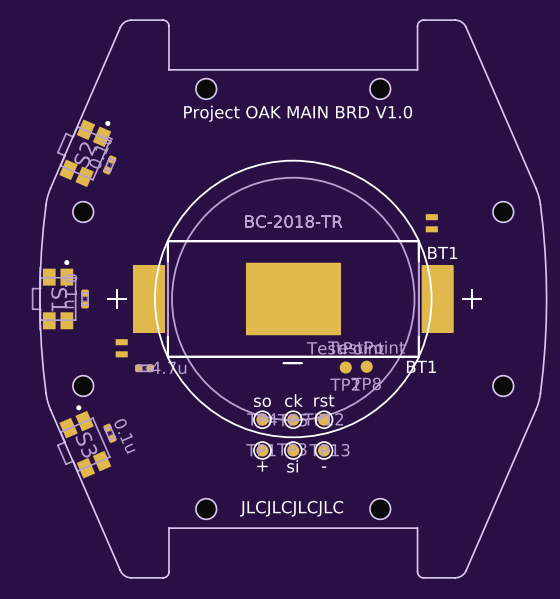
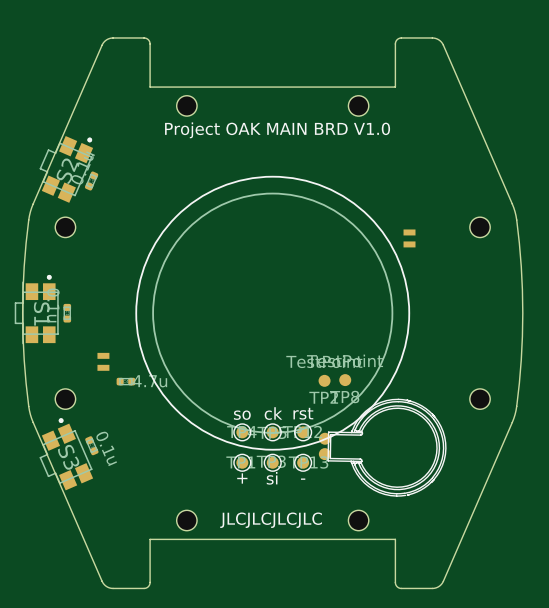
BT1: BC-2018-TR (294, 302) -> none
BT1: BC-2018-TR (294, 302) -> none
line: none -> (407, 400) (392, 399) (375, 404) (361, 415) (352, 430)
line: none -> (410, 401) (422, 406) (432, 414)
line: none -> (405, 402) (421, 408) (433, 418)
line: none -> (405, 402) (392, 401) (376, 406) (363, 416) (354, 431)
line: none -> (433, 415) (443, 431) (445, 448) (442, 465) (433, 479)
line: none -> (434, 416) (434, 416) (434, 416) (434, 416) (434, 416)
line: none -> (433, 419) (441, 432) (443, 448) (440, 464) (432, 477)
line: none -> (355, 429) (361, 431)
line: none -> (359, 431) (367, 418) (380, 409) (390, 406) (406, 406) (416, 410) (428, 419) (436, 433) (439, 448) (436, 463) (427, 476) (414, 485) (404, 488) (394, 489) (379, 485) (366, 476) (358, 462)
line: none -> (361, 431) (360, 435) (330, 434) (330, 458) (360, 459) (360, 462)
line: none -> (361, 431) (370, 419) (378, 413) (393, 408) (403, 408) (417, 413) (426, 420) (434, 433) (437, 448) (435, 458) (428, 472) (416, 482) (402, 486) (391, 486) (377, 481) (369, 475) (360, 462)
line: none -> (362, 432) (328, 432) (328, 460) (361, 461)
part: none -> (325, 438)
part: none -> (324, 454)
line: none -> (351, 463) (360, 478) (373, 489) (390, 495) (405, 495)
line: none -> (354, 463) (362, 477) (375, 488) (391, 493) (404, 493)
line: none -> (360, 462) (354, 464)
line: none -> (432, 477) (419, 488) (404, 493)
line: none -> (431, 482) (420, 490) (408, 494)

